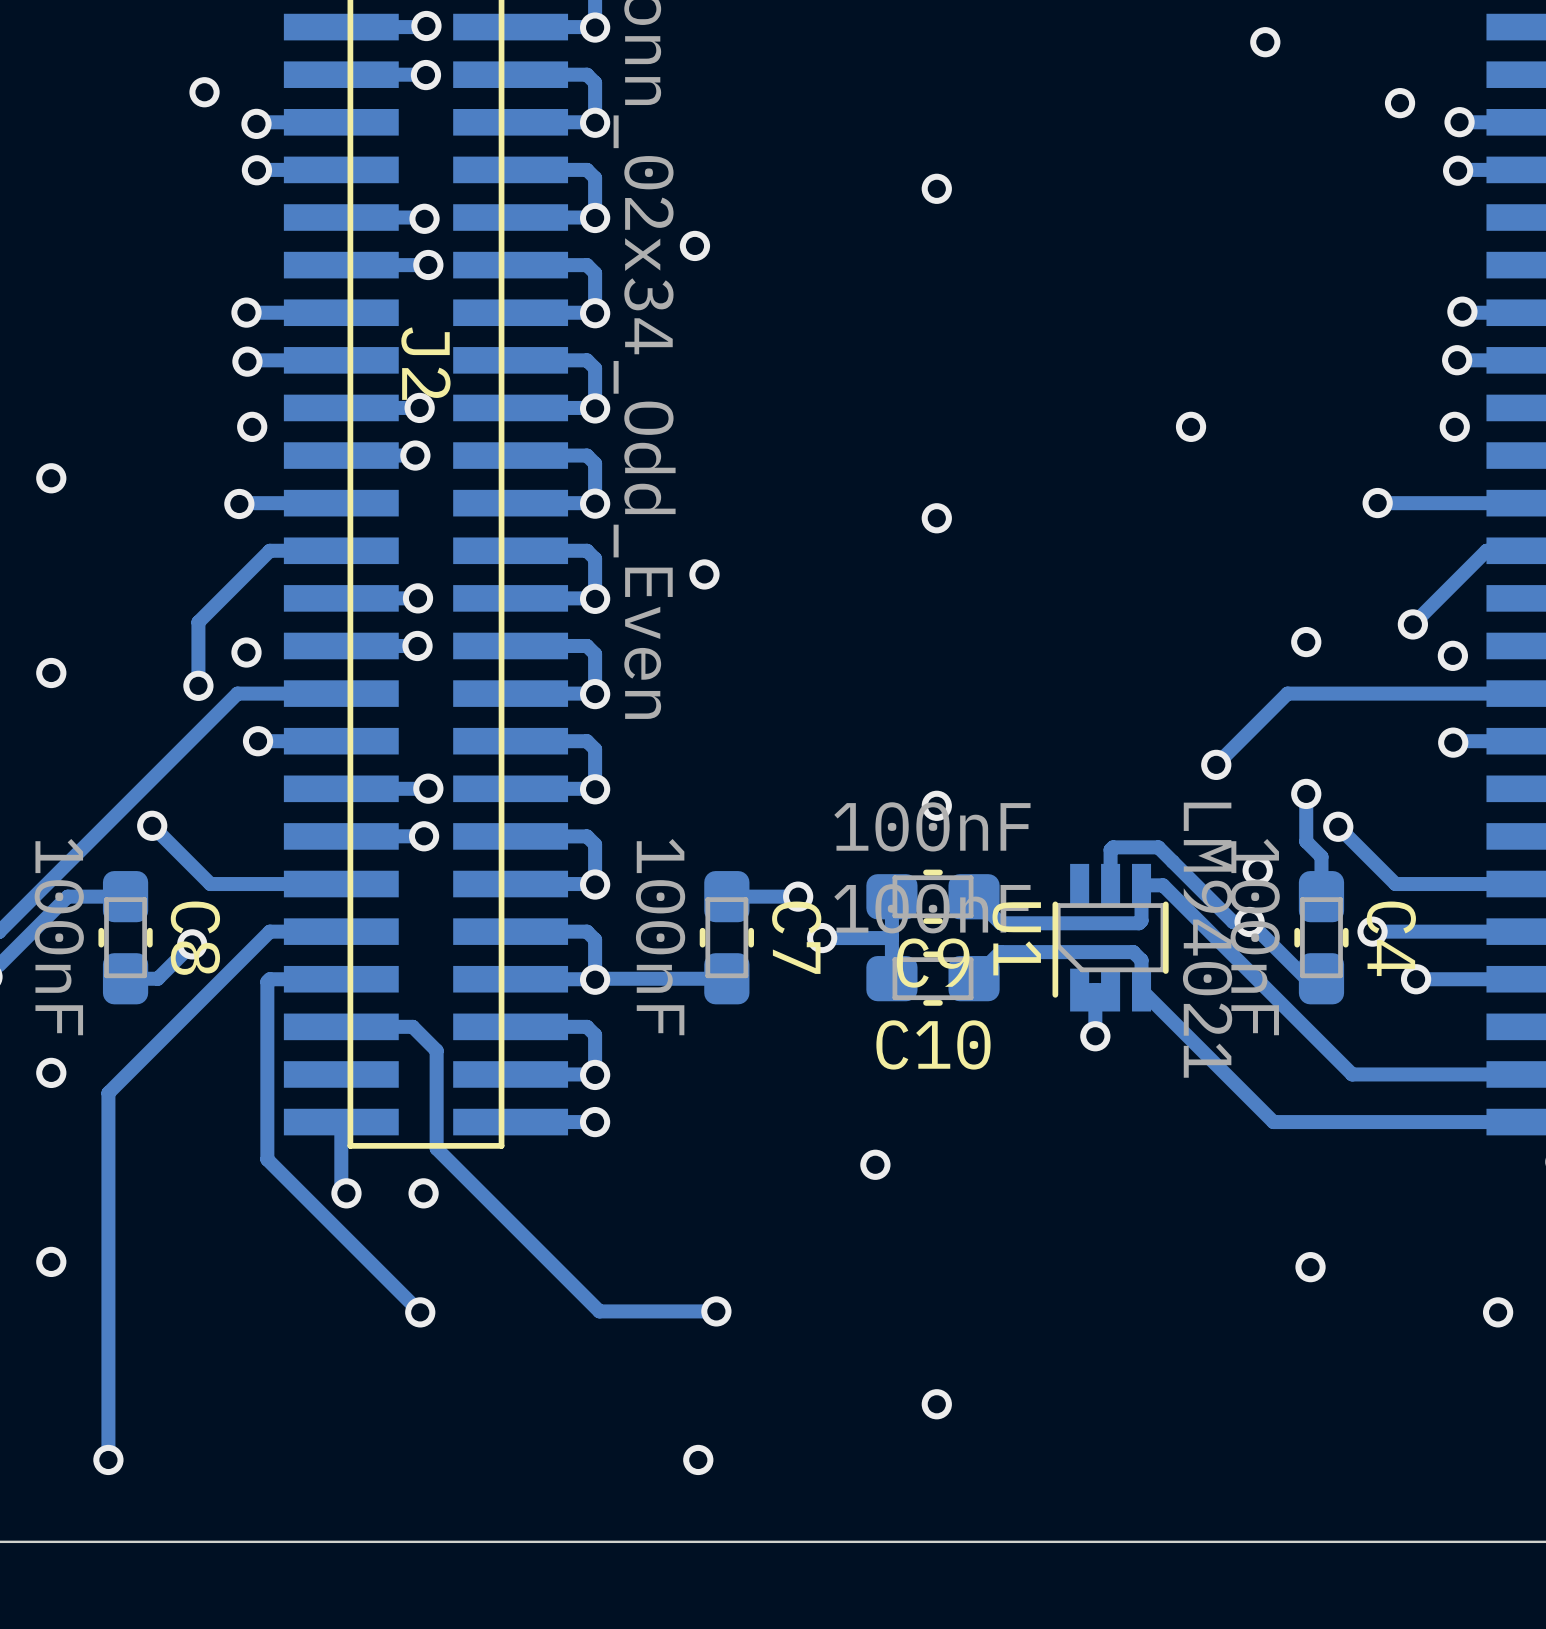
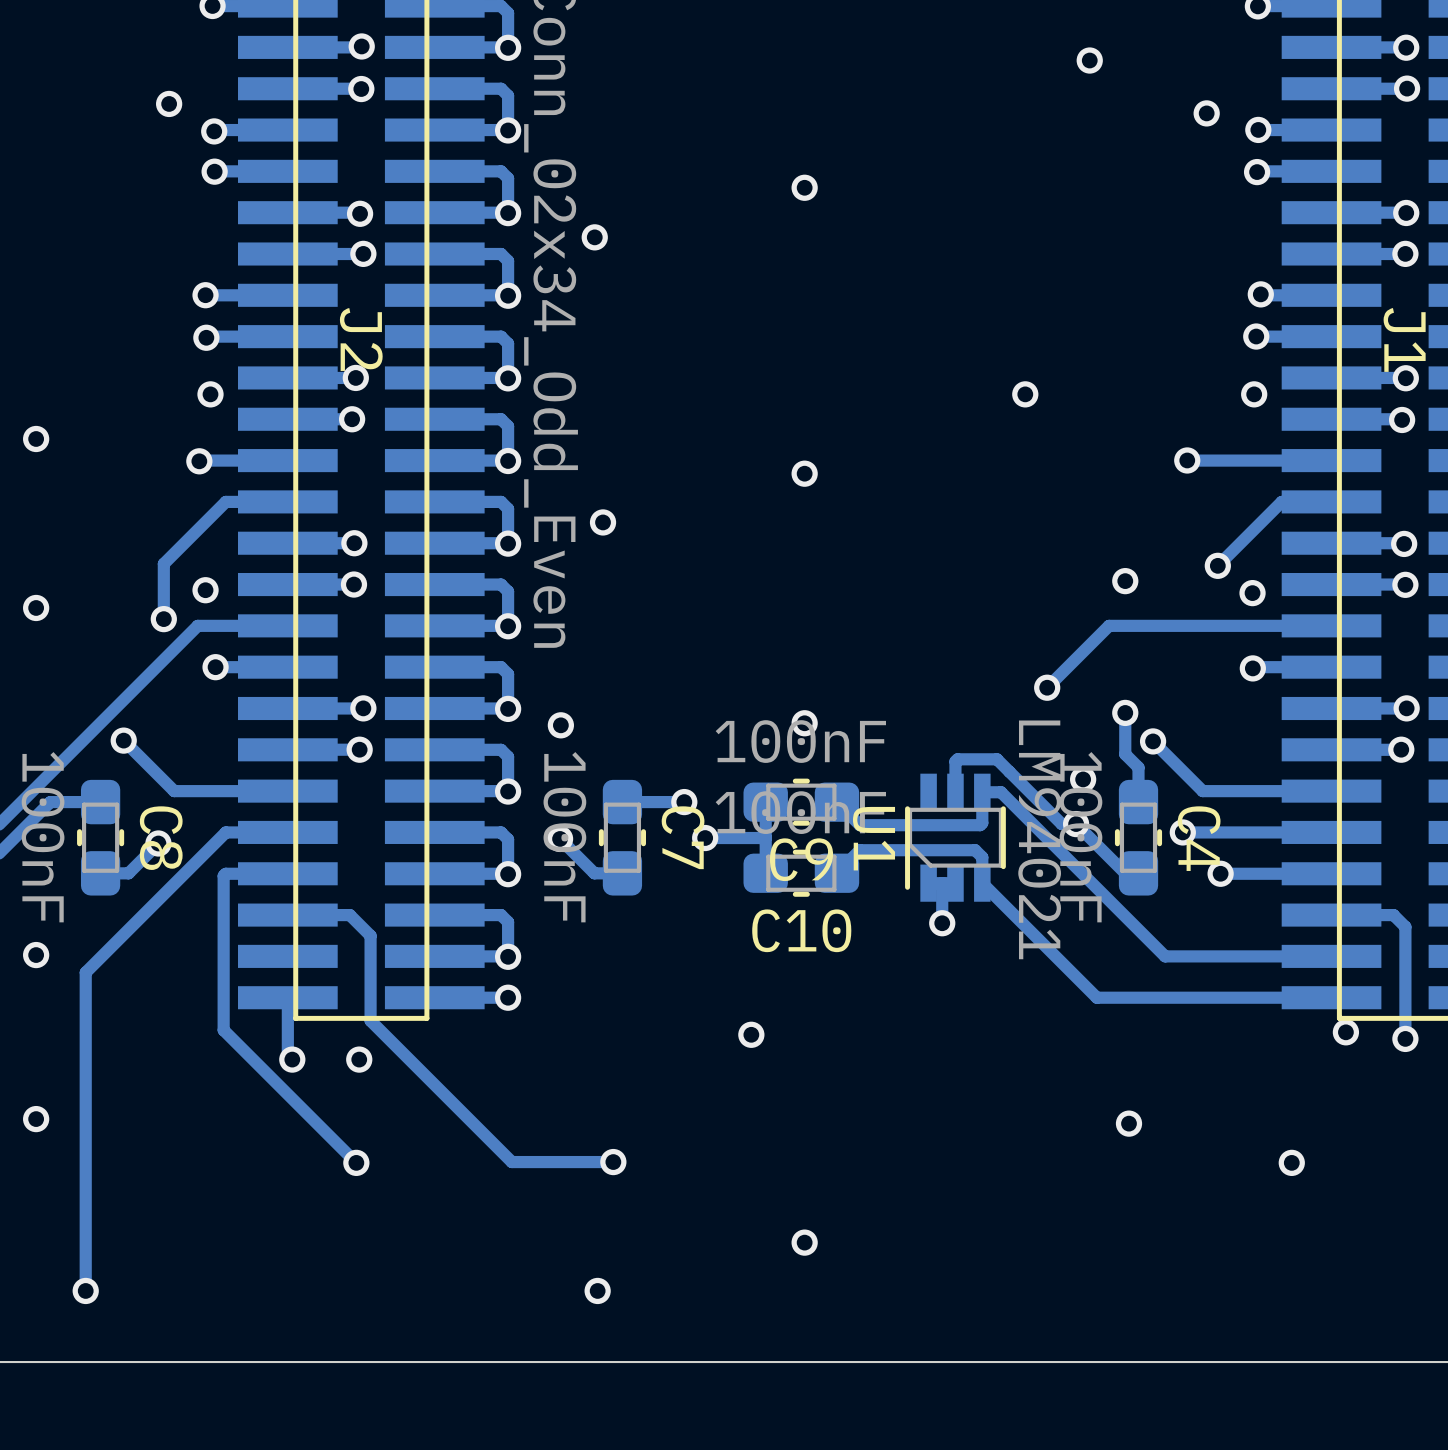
via: none -> (560, 725)
via: none -> (560, 838)
track: (694, 978) (596, 978) -> (594, 873) (560, 838)

